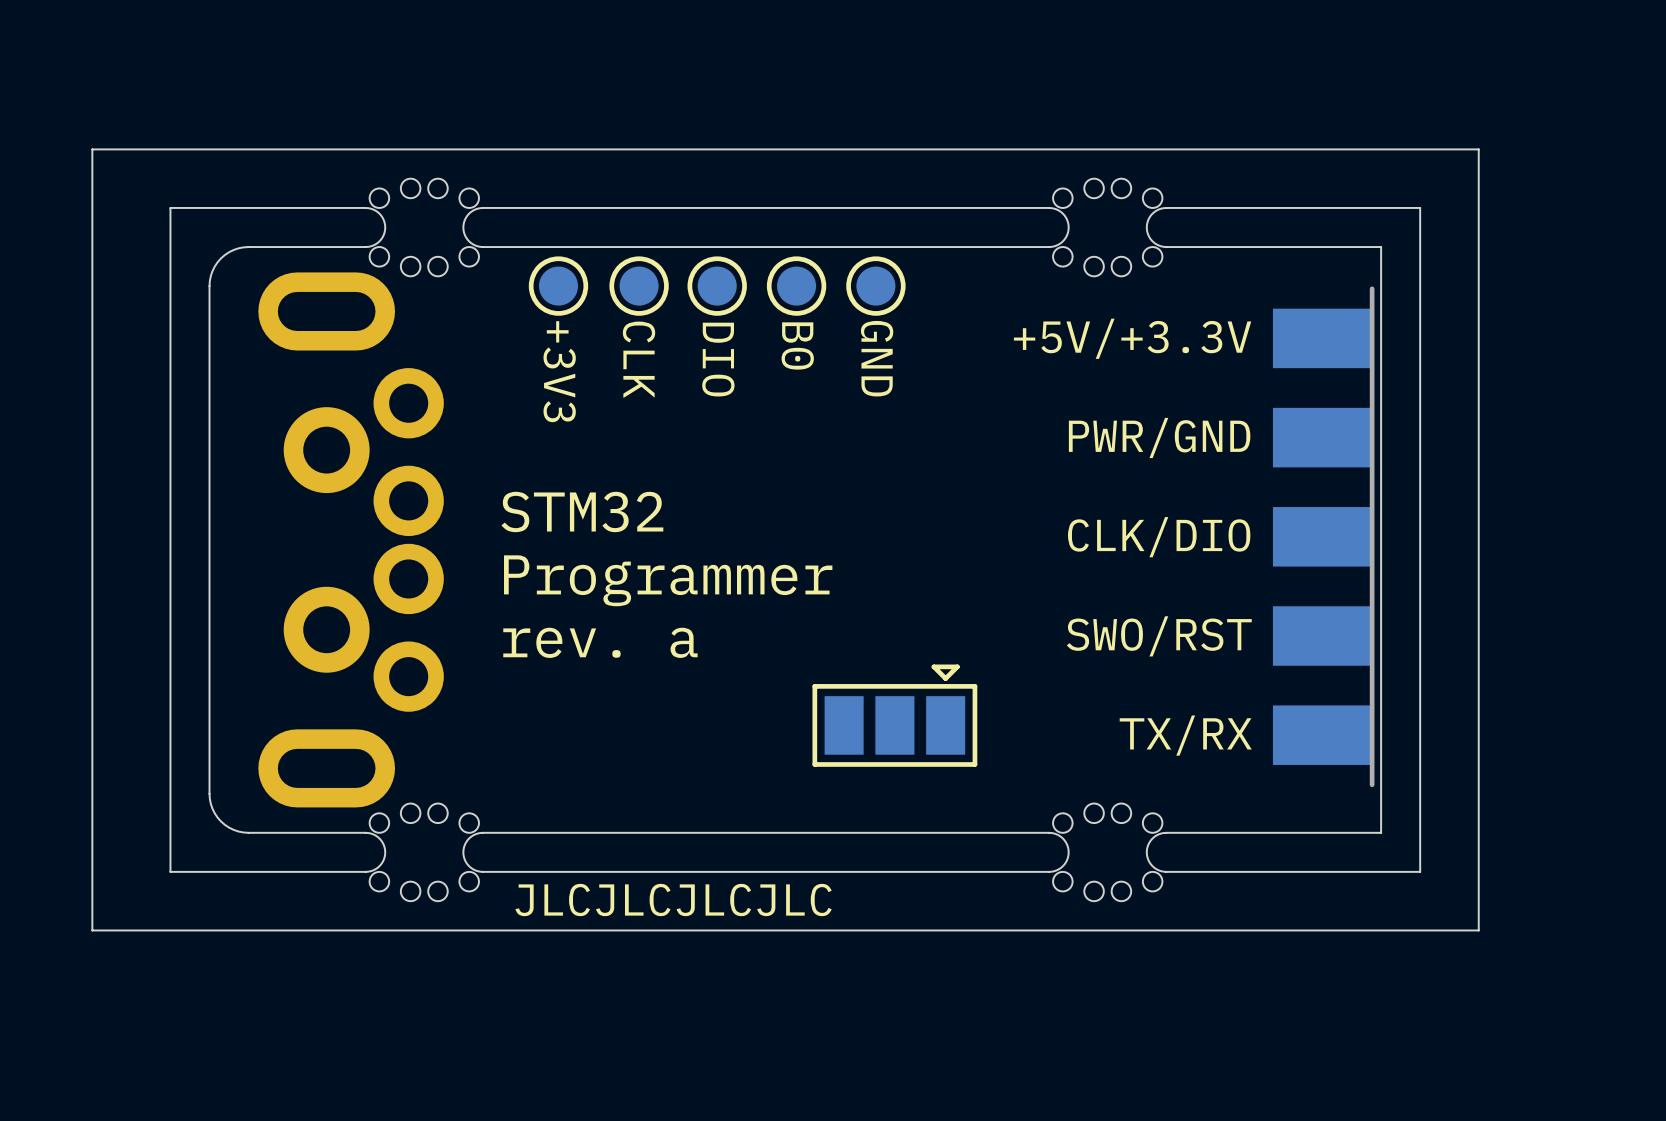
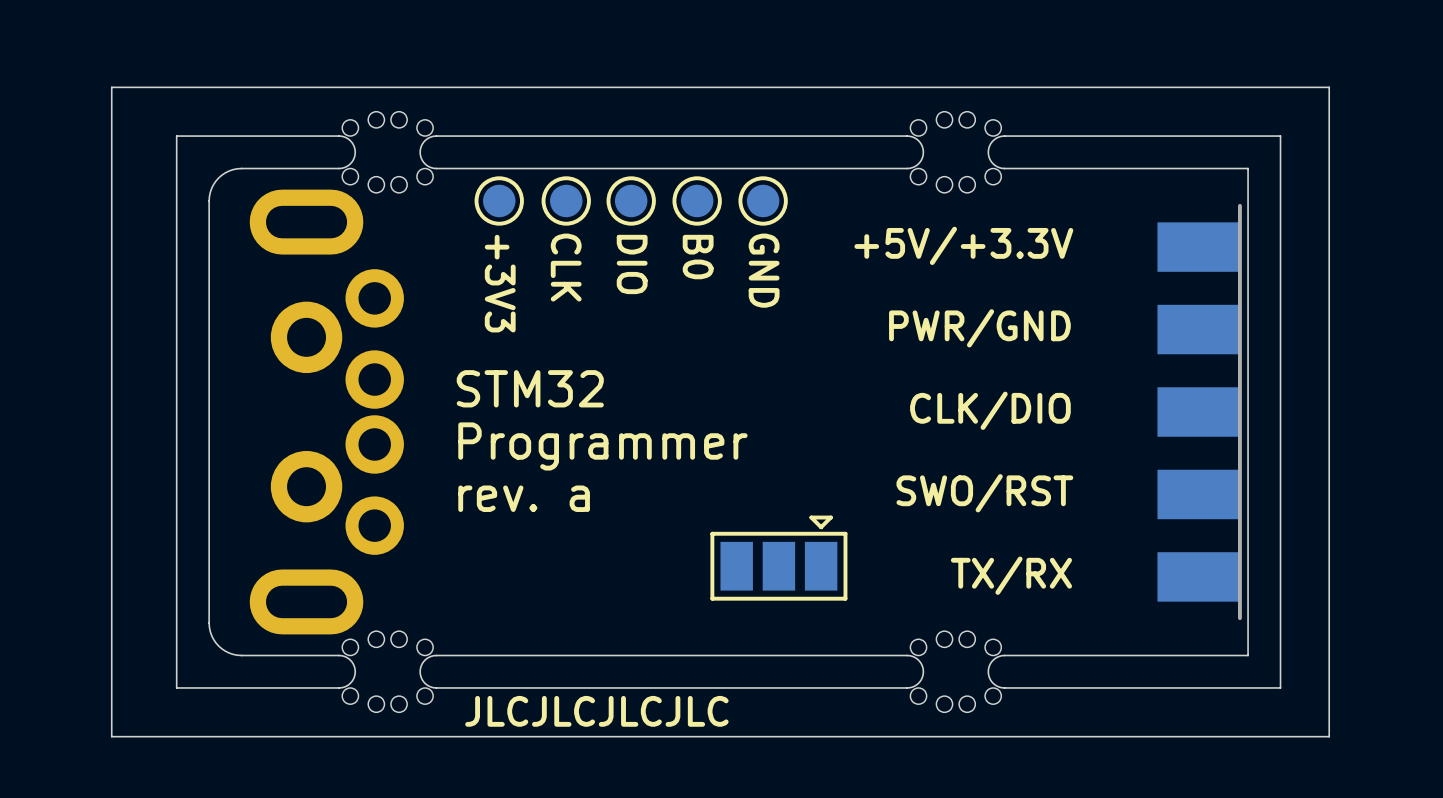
board edge: (1478, 149) (1478, 930) -> (1264, 87) (1329, 87) (1329, 736) (1264, 736)
board edge: (1420, 207) (1420, 871) -> (1215, 136) (1280, 136) (1280, 687) (1215, 687)
board edge: (1381, 247) (1381, 832) -> (1183, 168) (1248, 168) (1248, 655) (1183, 655)
part position: (1323, 536) -> (1199, 412)

